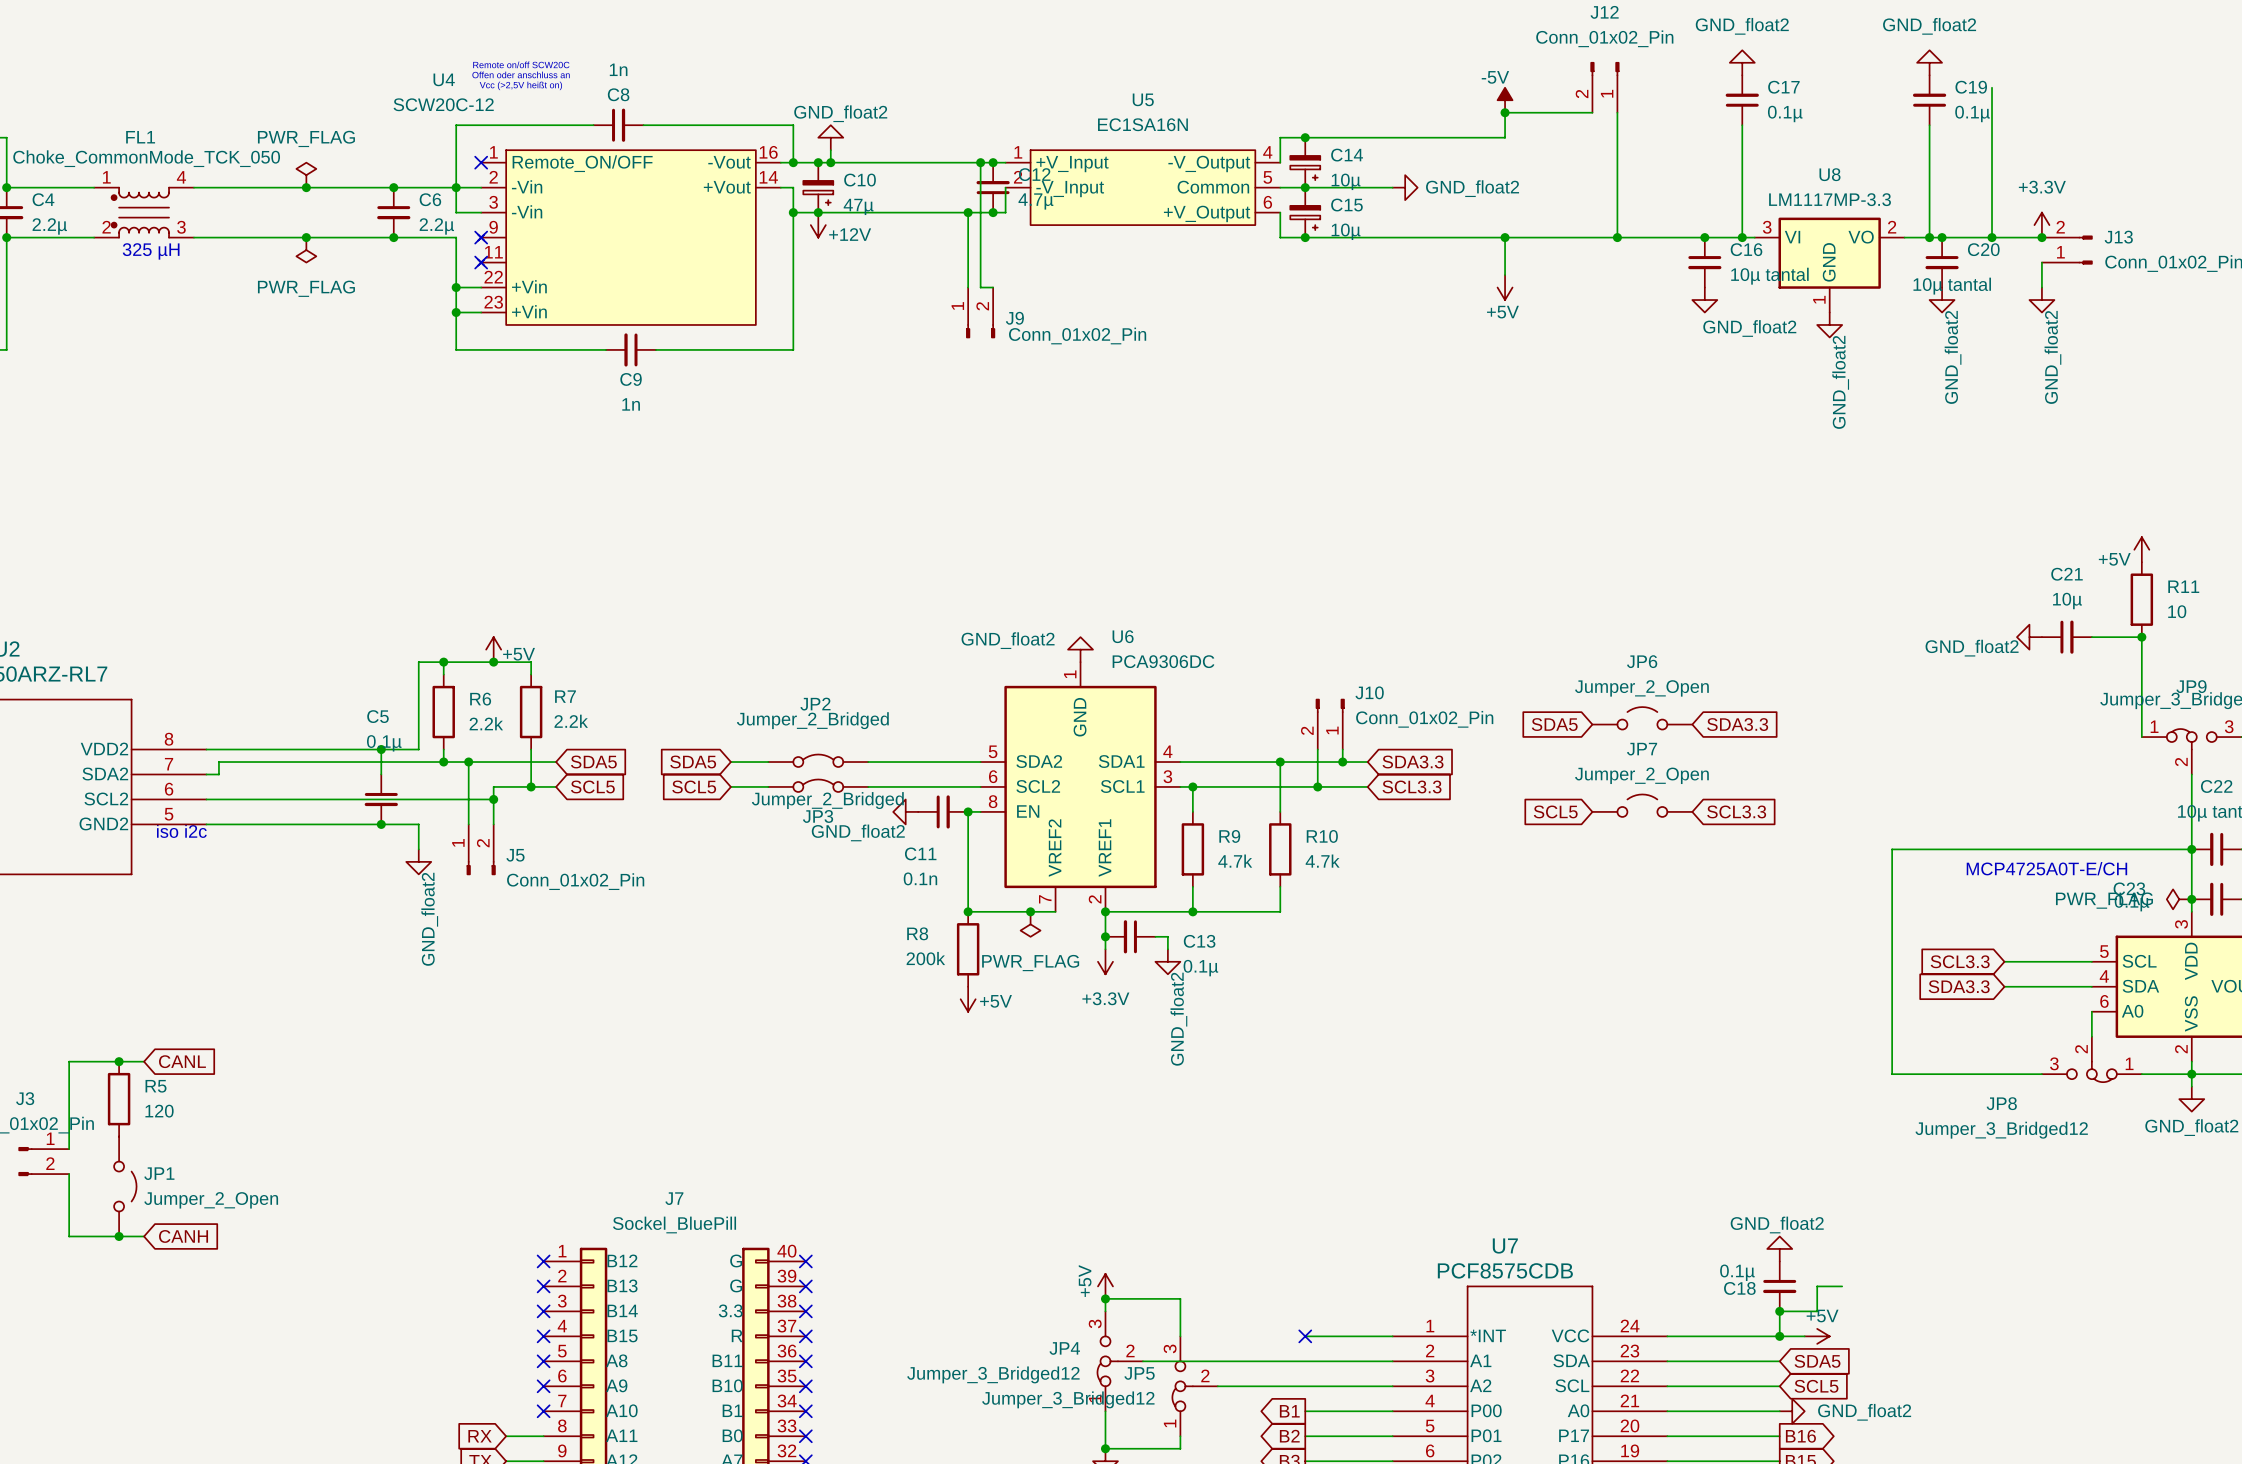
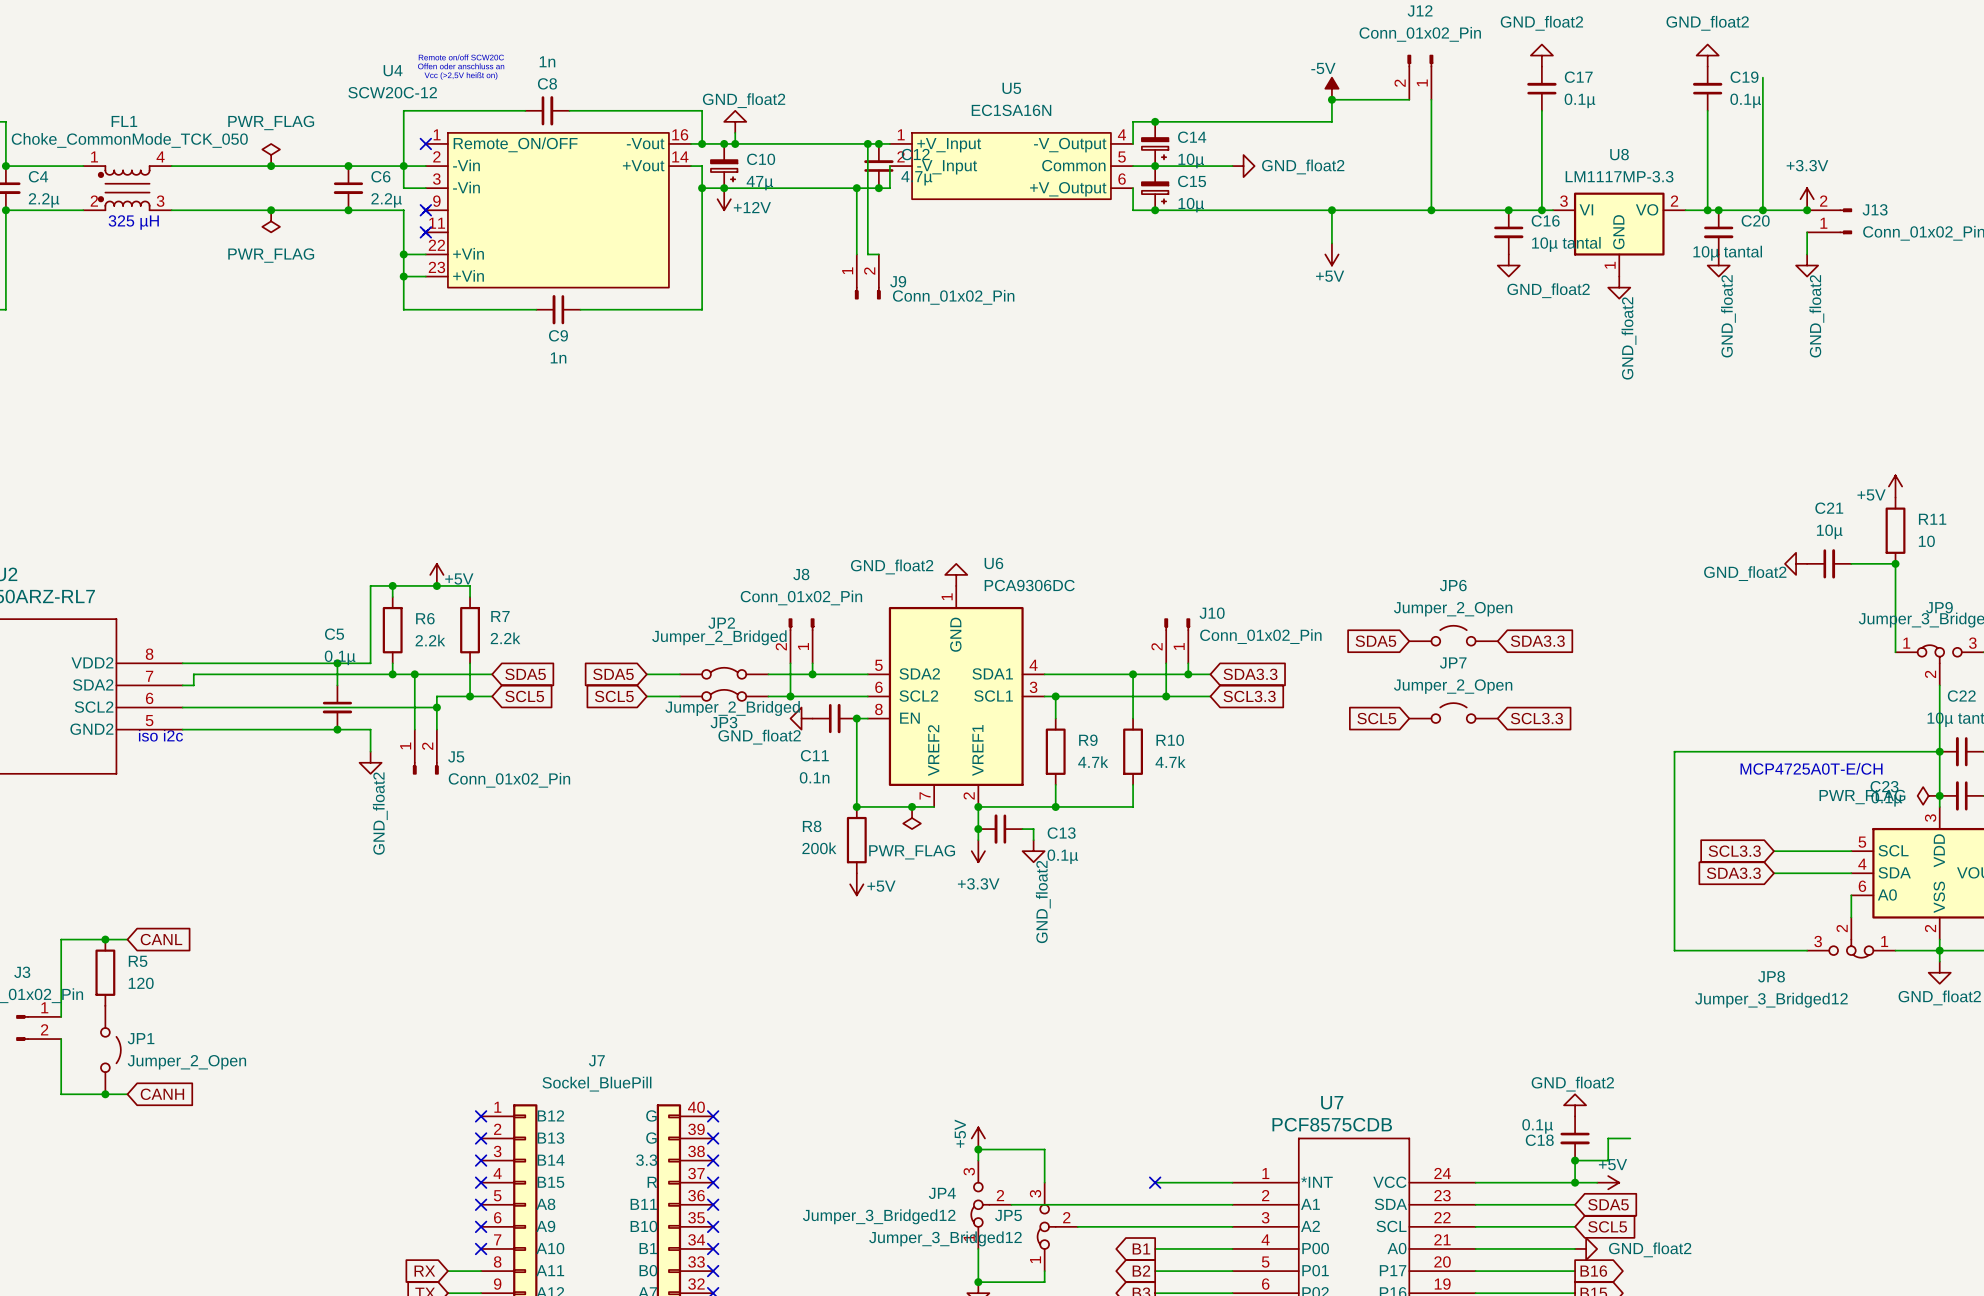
J8: none -> Conn_01x02_Pin (801, 640)
wire: none -> (790, 663) (790, 696)
wire: none -> (812, 663) (812, 674)
junction: none -> (812, 674)
junction: none -> (790, 696)

